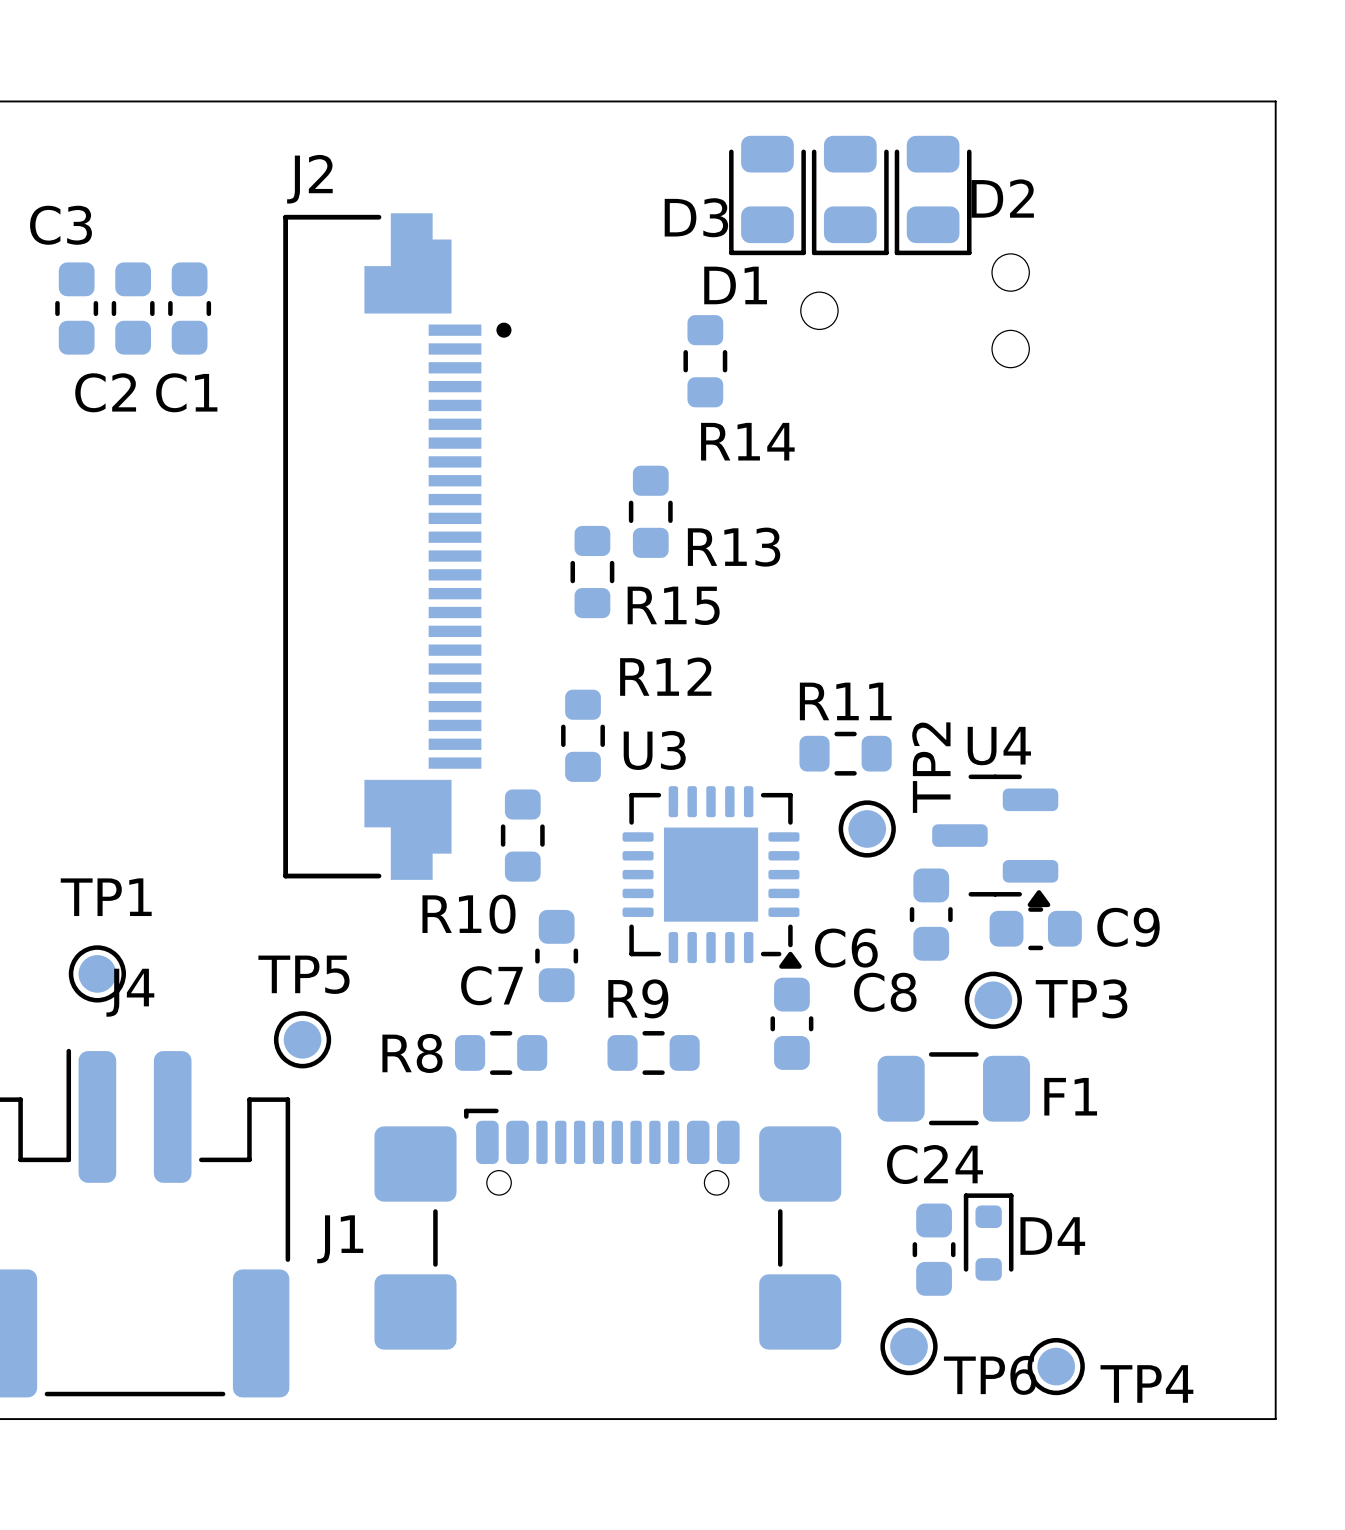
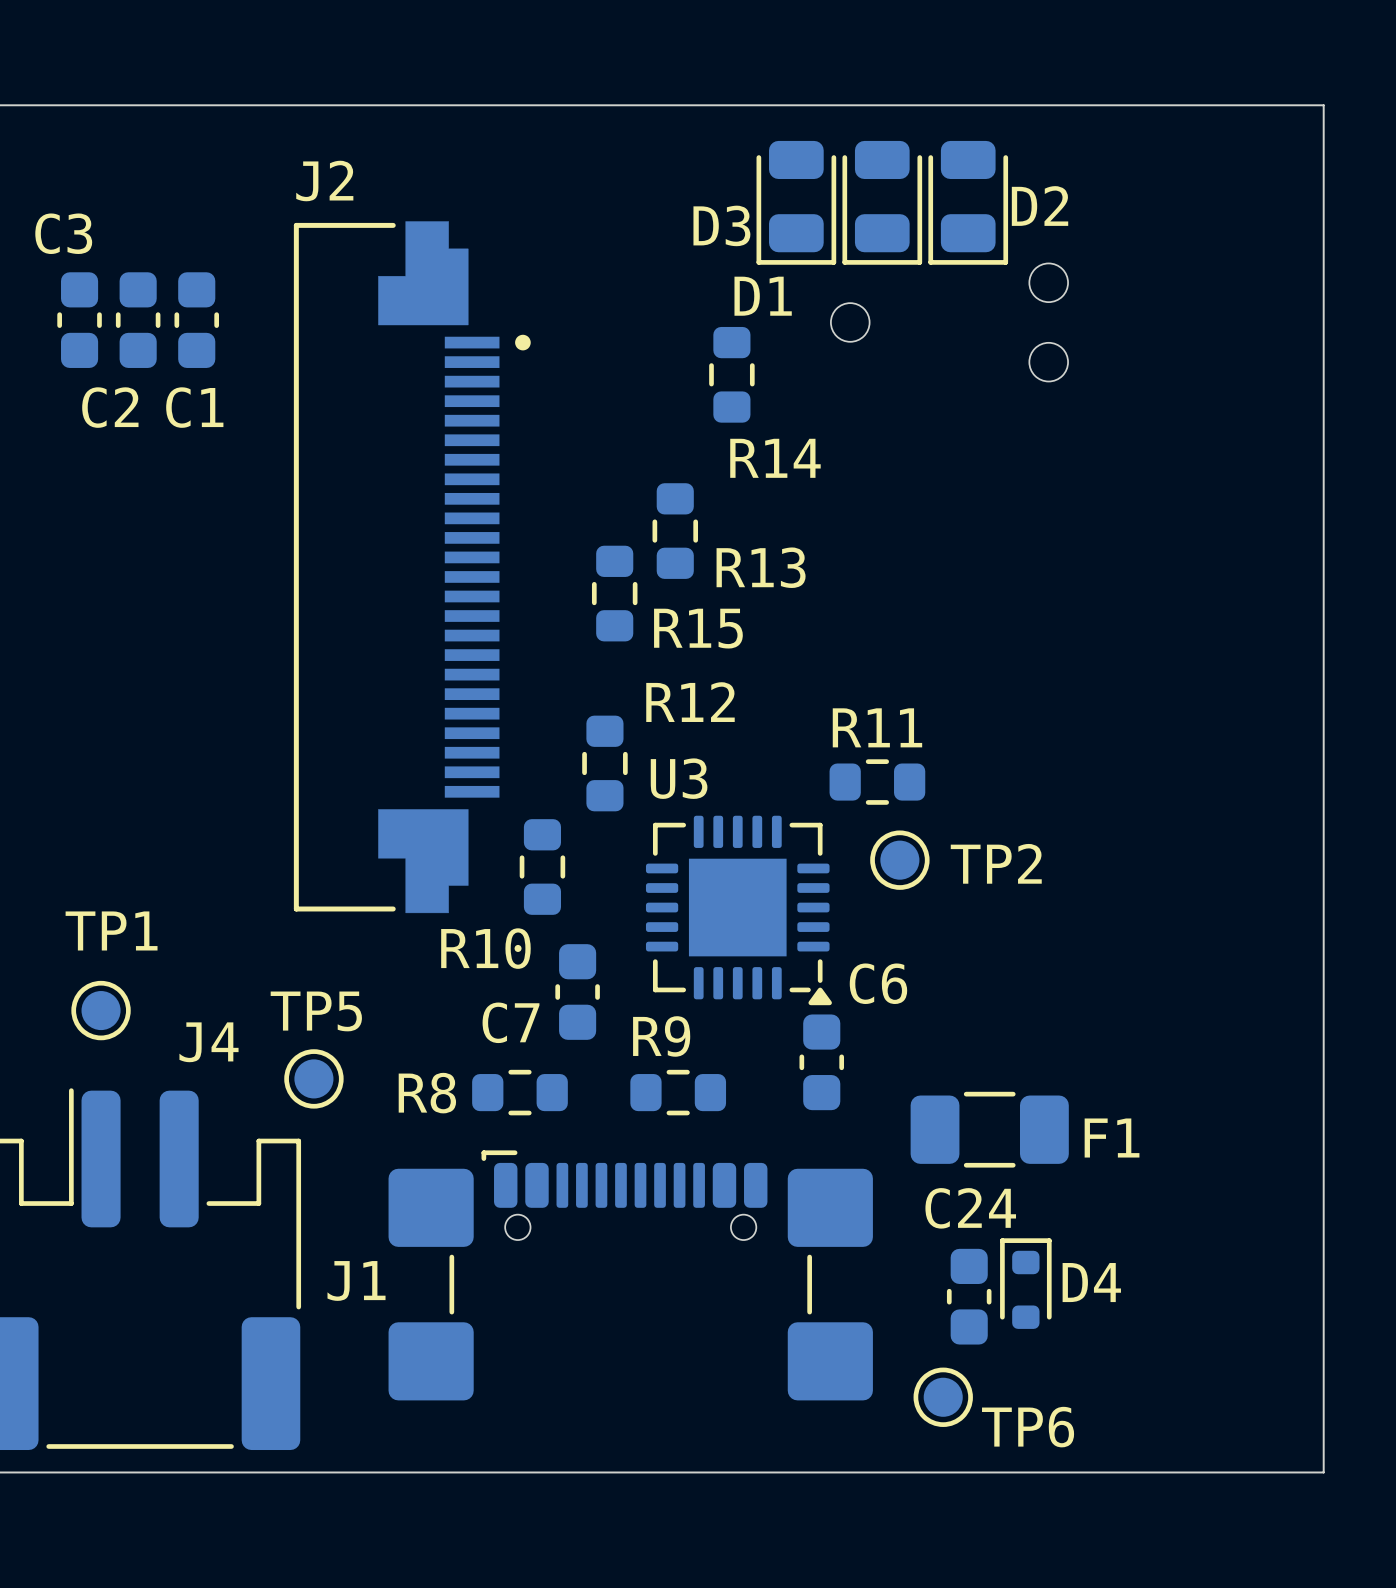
TP2 name rotation: 0° (931, 767) -> 90° clockwise (996, 863)
U4: (995, 840) -> none
C8: (931, 914) -> none
C9: (1035, 928) -> none
J4 name position: J4 (130, 992) -> J4 (209, 1042)
TP3: (993, 1000) -> none
TP4: (1056, 1366) -> none

